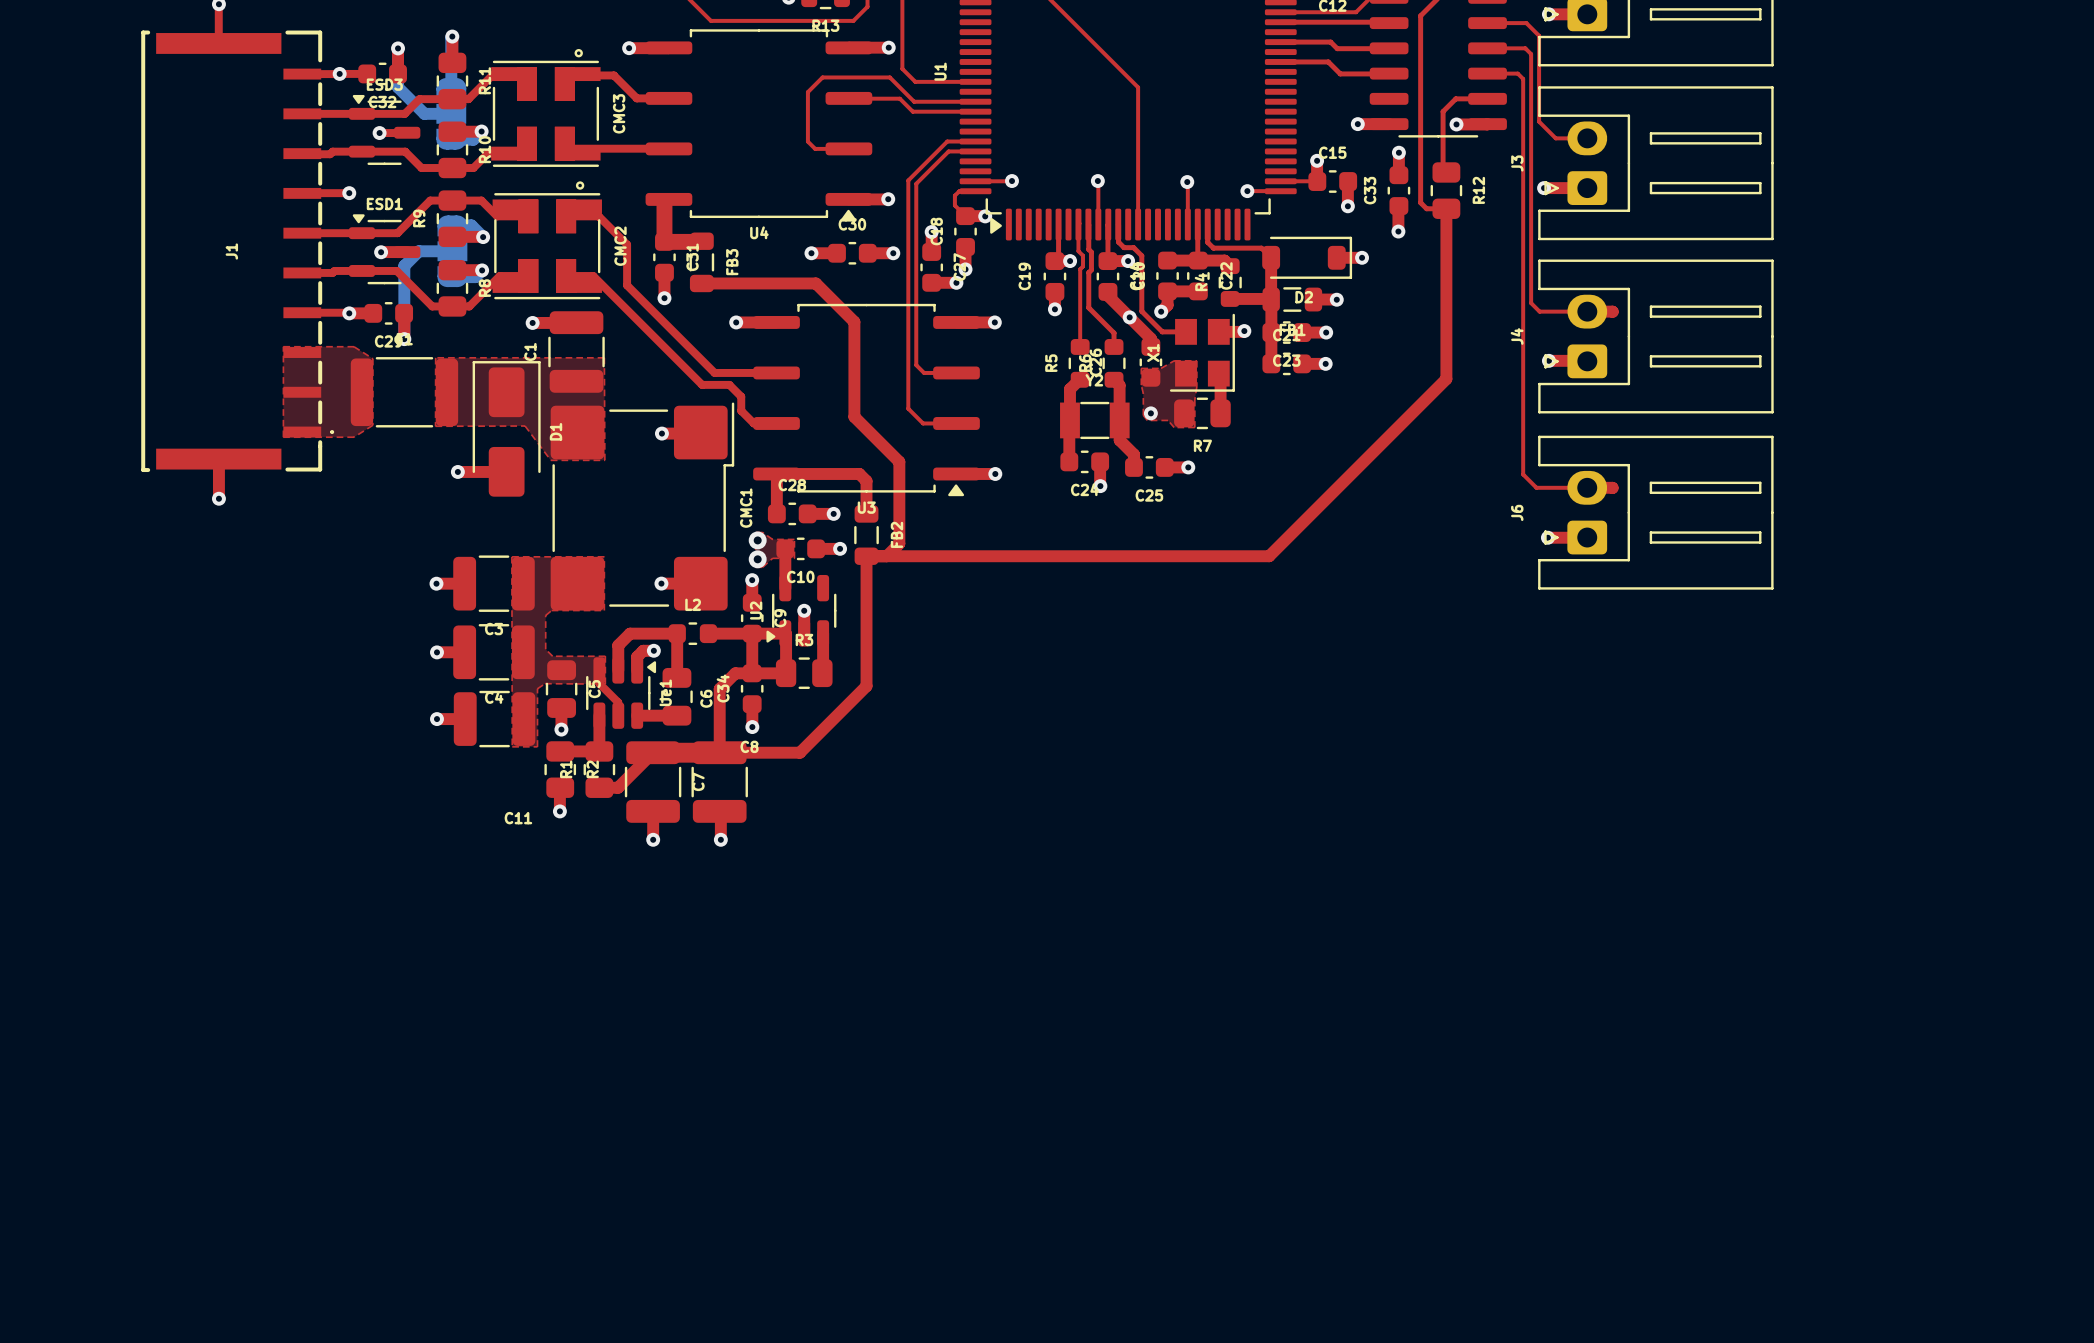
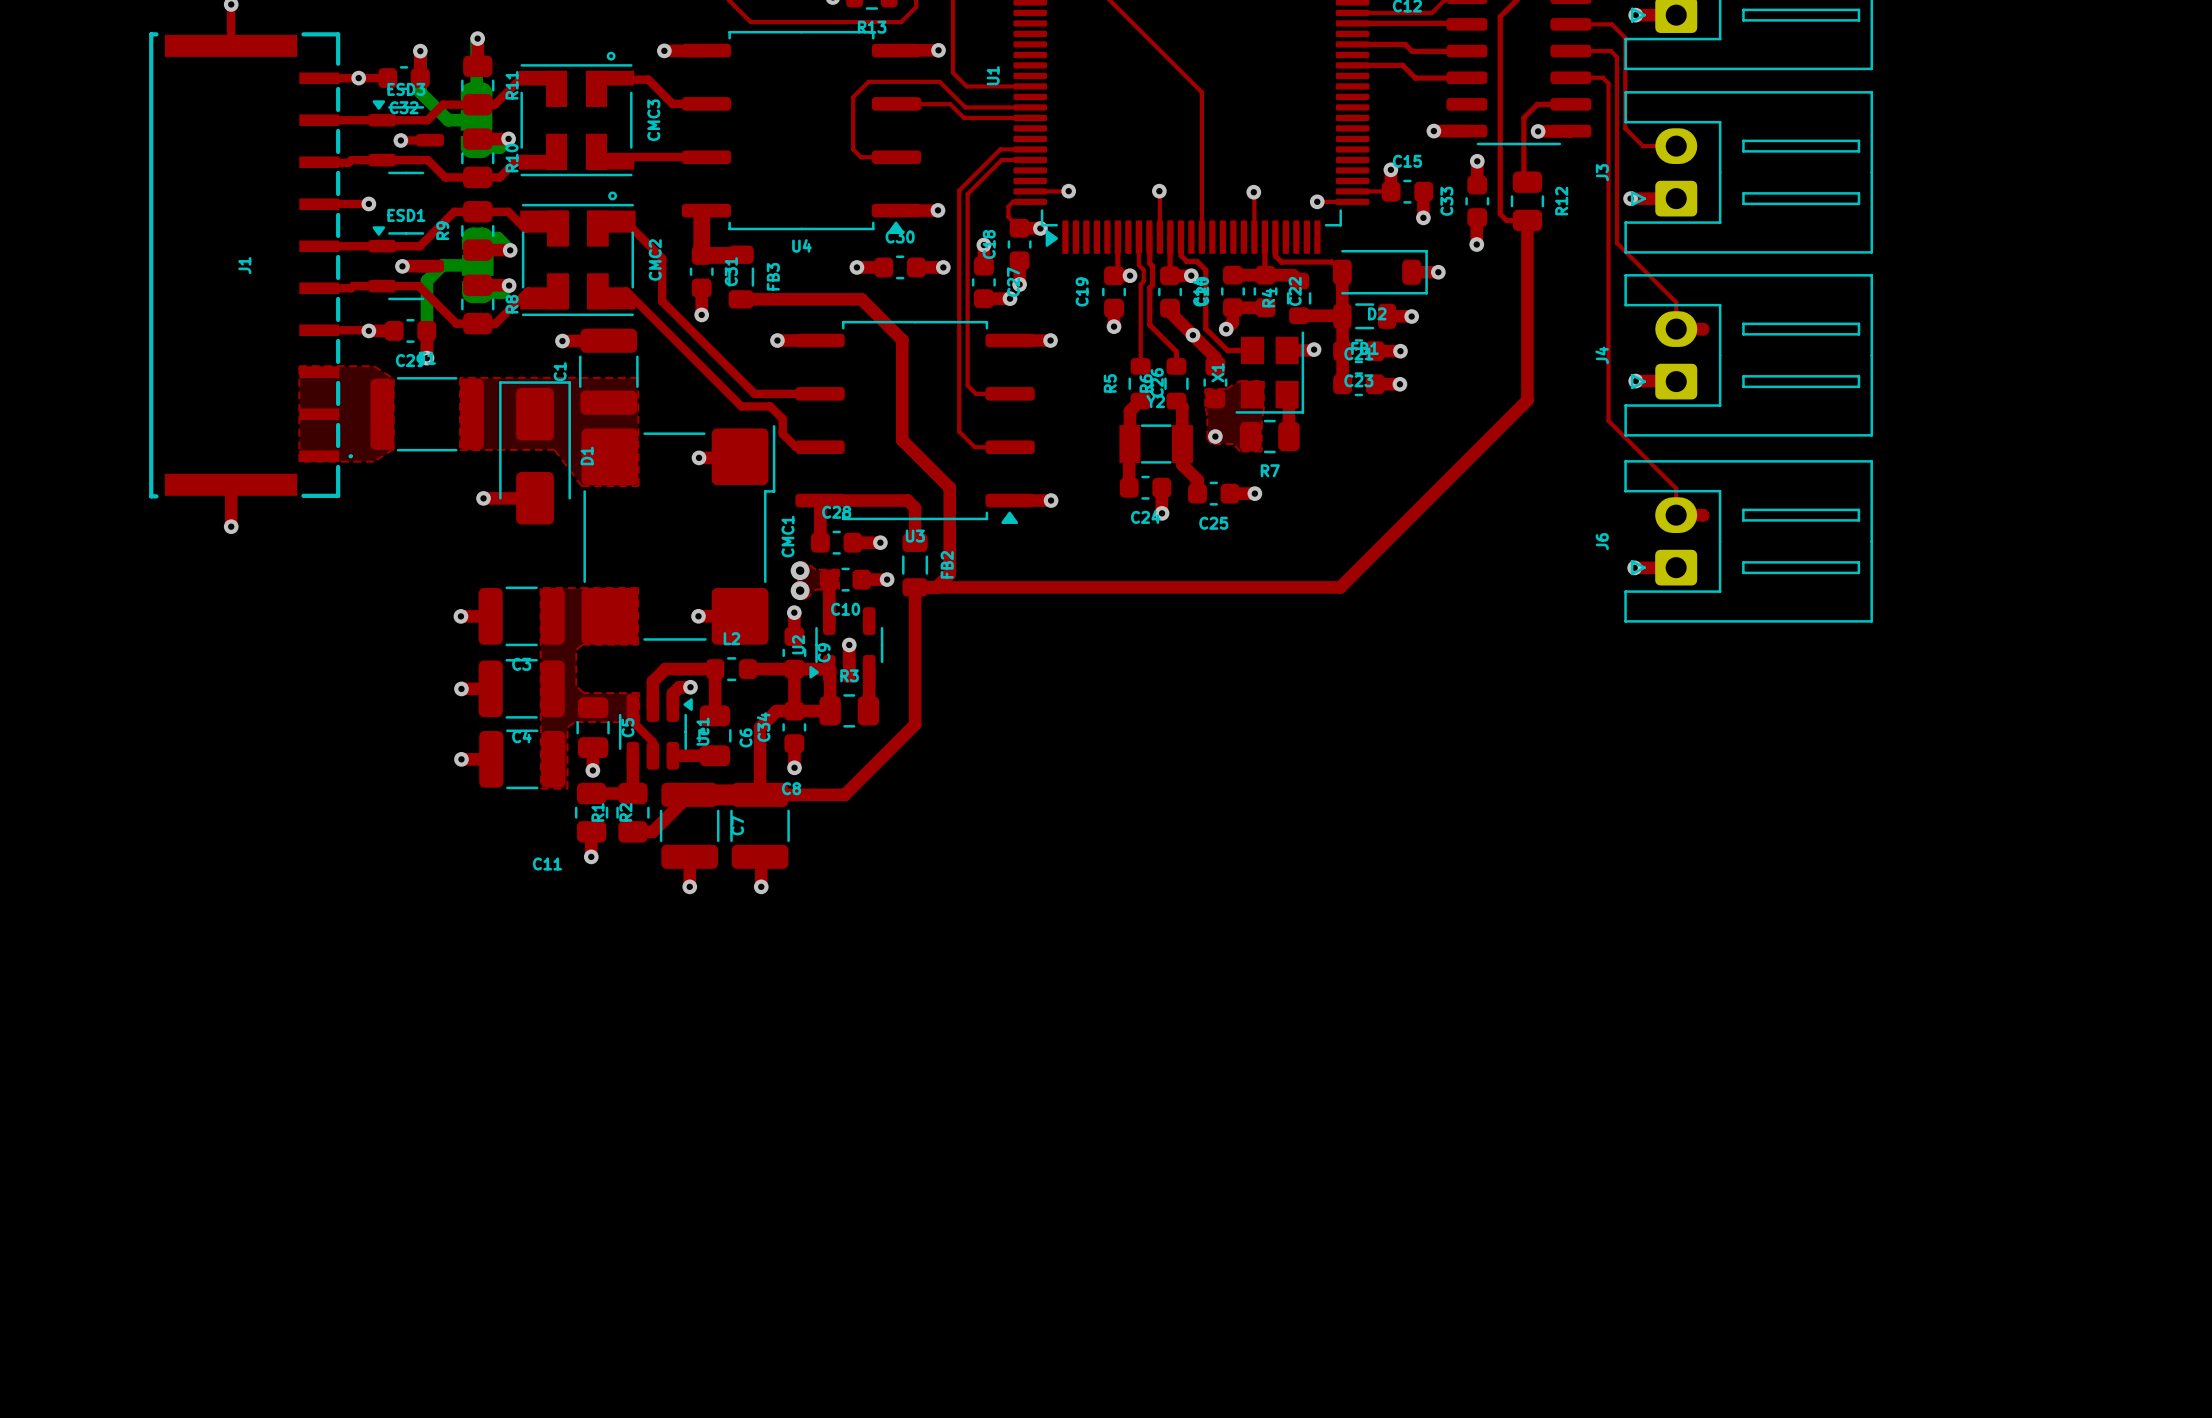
top track: (1531, 230) (1531, 303) (1539, 311) (1587, 311) -> (1616, 243) (1676, 302) (1676, 329)
top track: (1523, 398) (1523, 474) (1536, 487) (1587, 487) -> (1608, 420) (1676, 488) (1676, 515)

